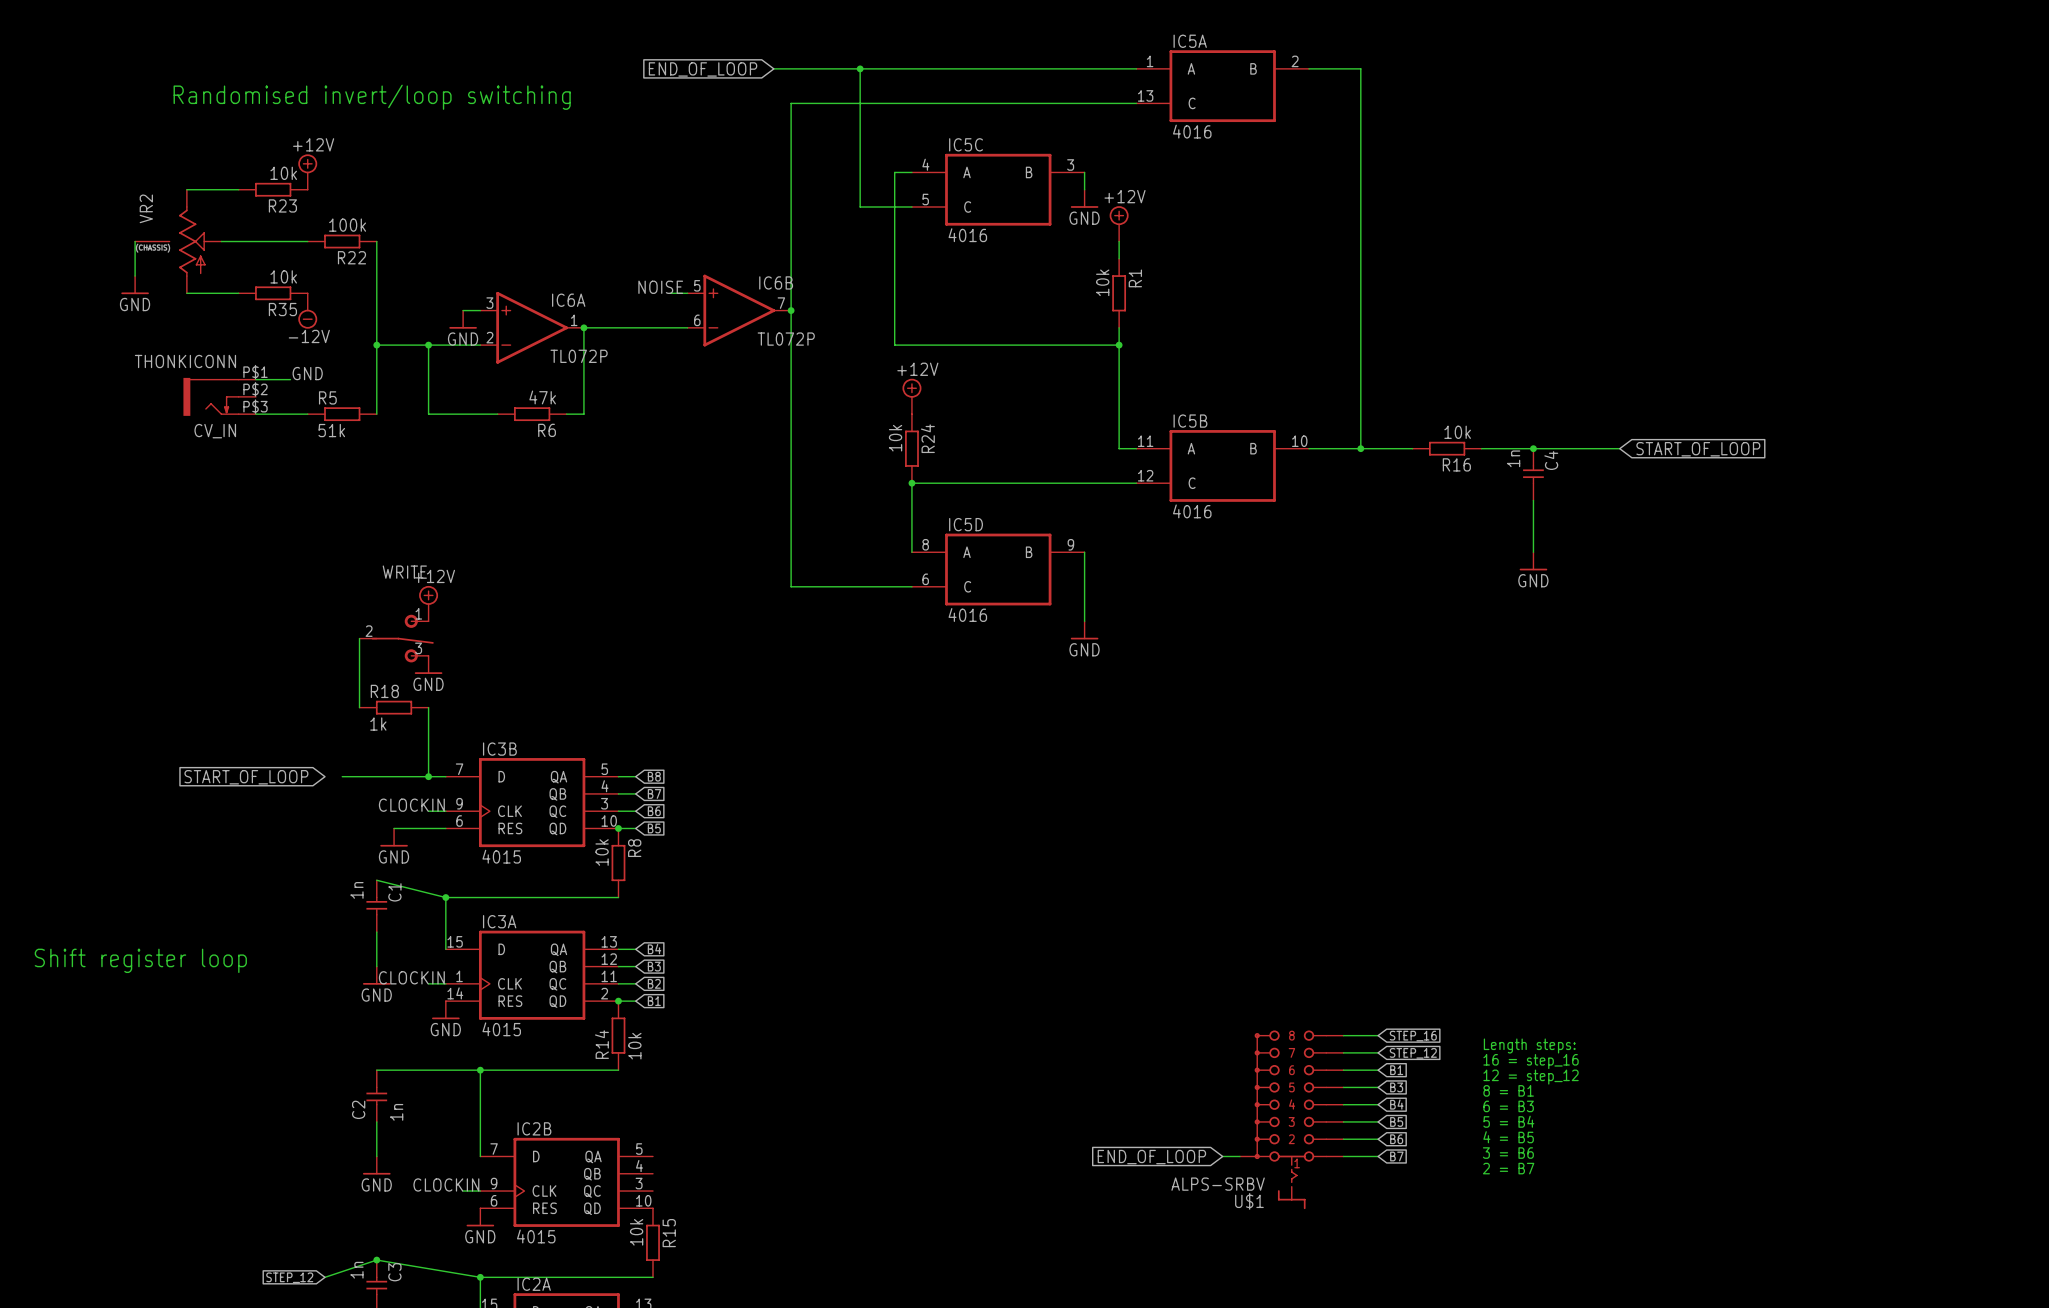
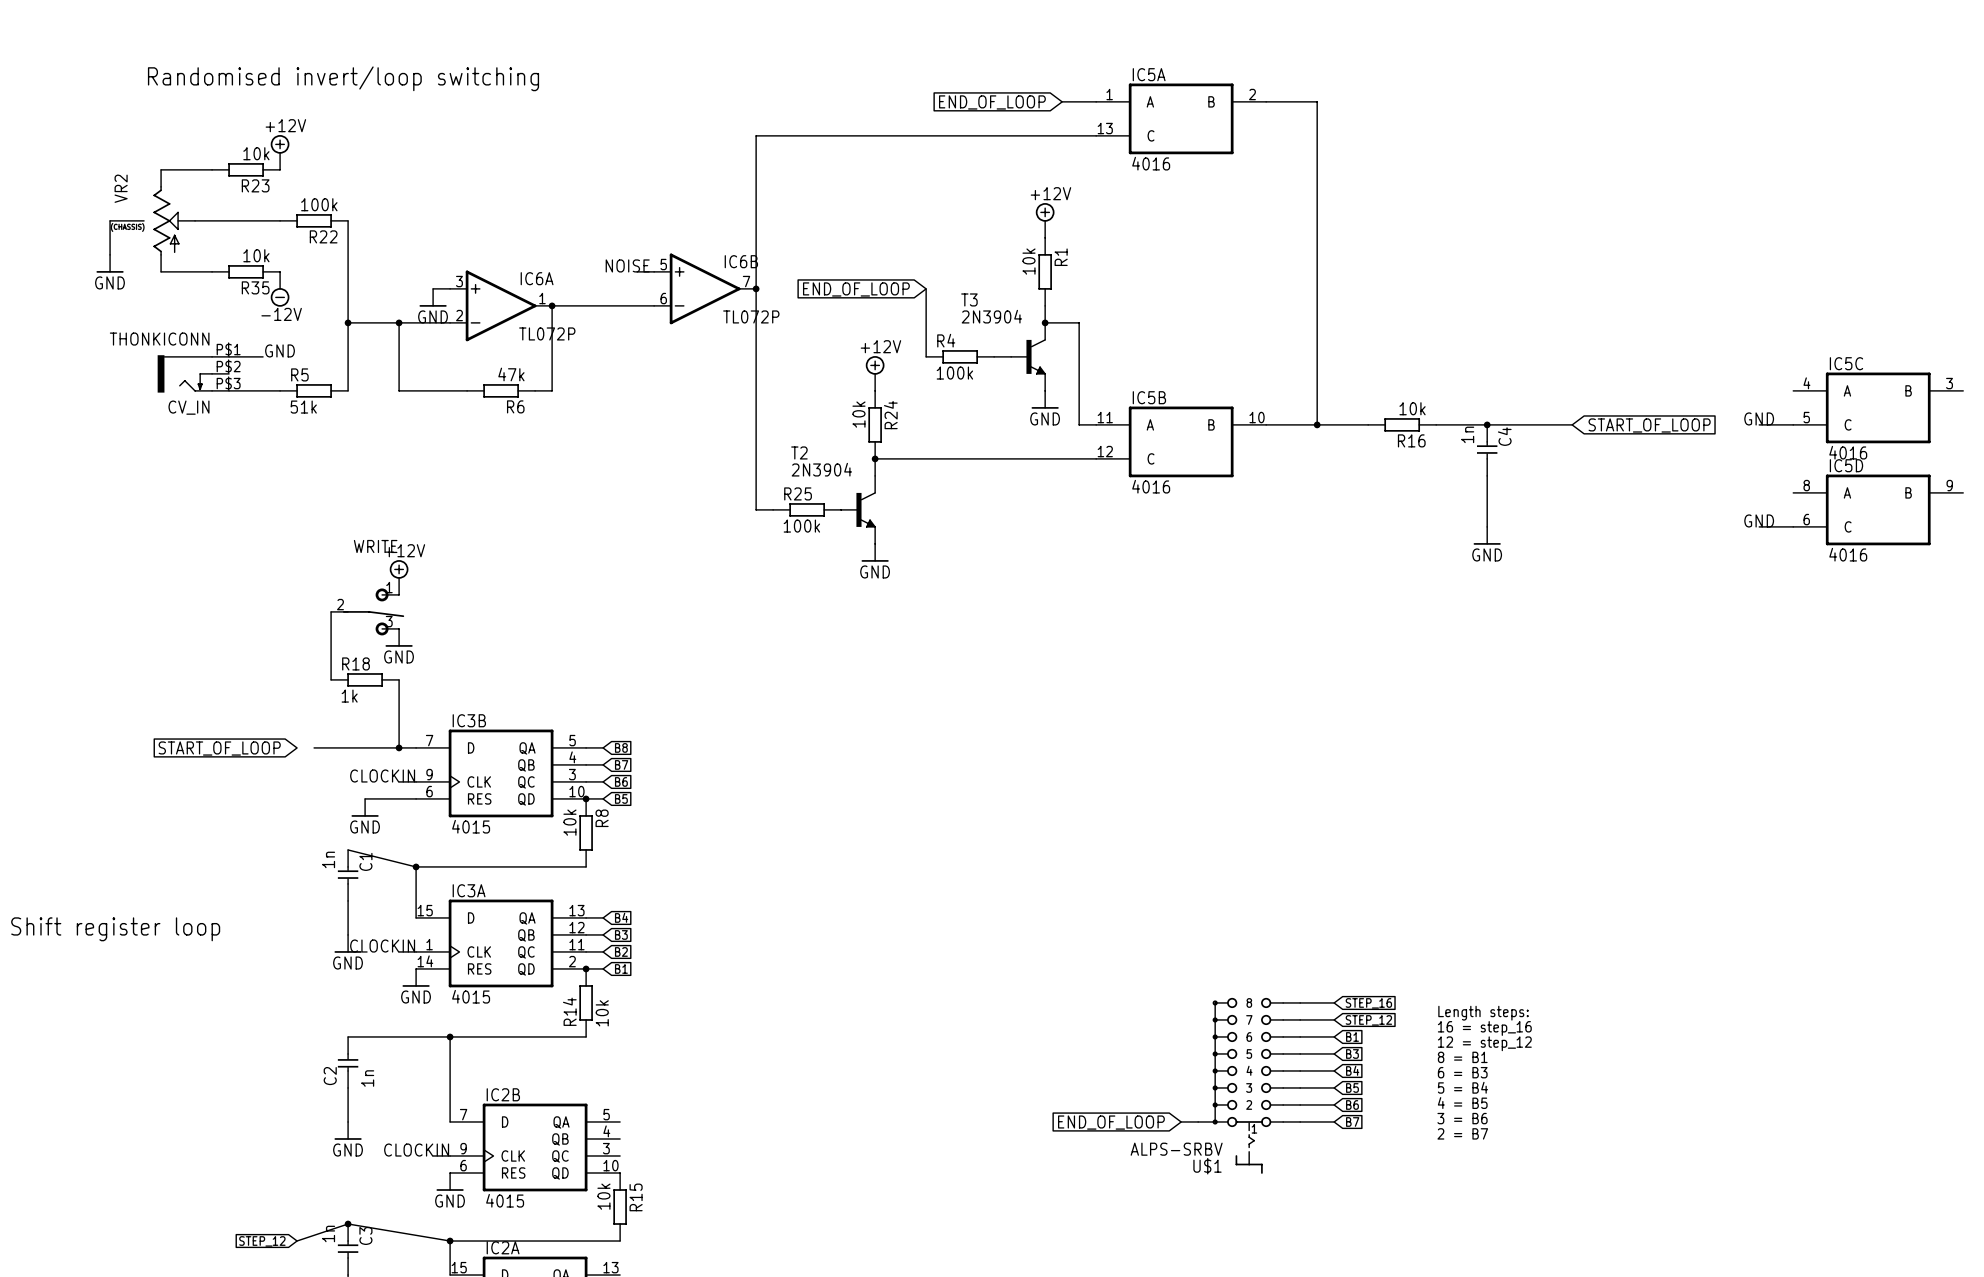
wire: (773, 68) (1136, 68) -> none
wire: (860, 68) (860, 206) (911, 206) -> none
junction: (860, 68) -> none
wire: (1309, 68) (1360, 68) (1360, 120) -> (1266, 101) (1317, 101)
global label: END_OF_LOOP (703, 69) -> none
IC5A position: (1222, 86) -> (1181, 118)
wire: (1136, 103) (791, 103) (791, 155) -> (1096, 135) (756, 135)
wire: none -> (1062, 101) (1096, 101)
global label: none -> END_OF_LOOP (992, 102)
wire: (911, 172) (894, 172) (894, 345) (1084, 345) -> (1045, 305) (1045, 322)
wire: (1084, 172) (1084, 189) -> none
IC5C position: (998, 189) -> (1878, 407)
power symbol: GND (1084, 198) -> none
power symbol position: +12V (1119, 223) -> +12V (1045, 220)
wire: (1119, 241) (1119, 258) -> none
R1 position: (1119, 293) -> (1045, 271)
wire: none -> (926, 288) (926, 356)
global label: none -> END_OF_LOOP (856, 289)
wire: (1119, 327) (1119, 345) -> none
junction position: (1119, 345) -> (1045, 322)
R4: none -> 100k (960, 356)
wire: none -> (994, 356) (1011, 356)
T3: none -> 2N3904 (1028, 356)
power symbol: none -> GND (1045, 399)
label: none -> GND (1759, 418)
wire: none -> (1759, 424) (1793, 424)
wire: (911, 500) (911, 552) -> none
wire: (791, 535) (791, 586) (911, 586) -> (756, 509) (773, 509)
R25: none -> 100k (807, 509)
T2: none -> 2N3904 (858, 509)
label: none -> GND (1759, 520)
wire: (1084, 552) (1084, 621) -> none
wire: none -> (1759, 526) (1793, 526)
IC5D position: (998, 569) -> (1878, 509)
power symbol: none -> GND (875, 552)
power symbol: GND (1084, 630) -> none

